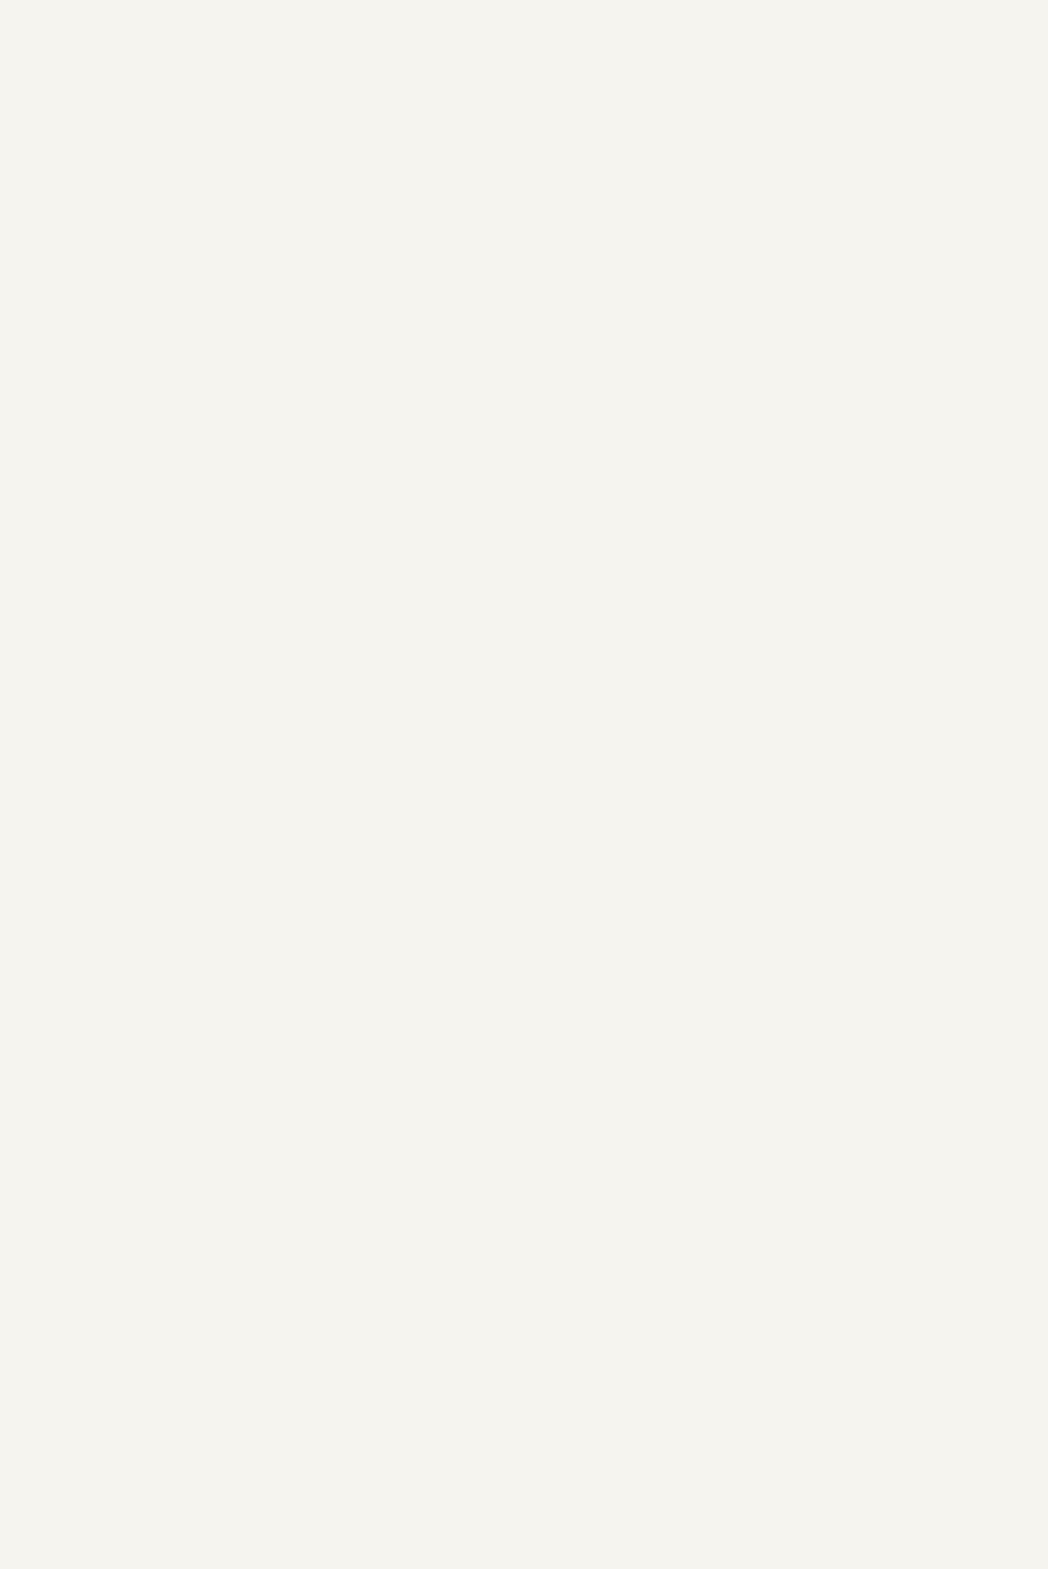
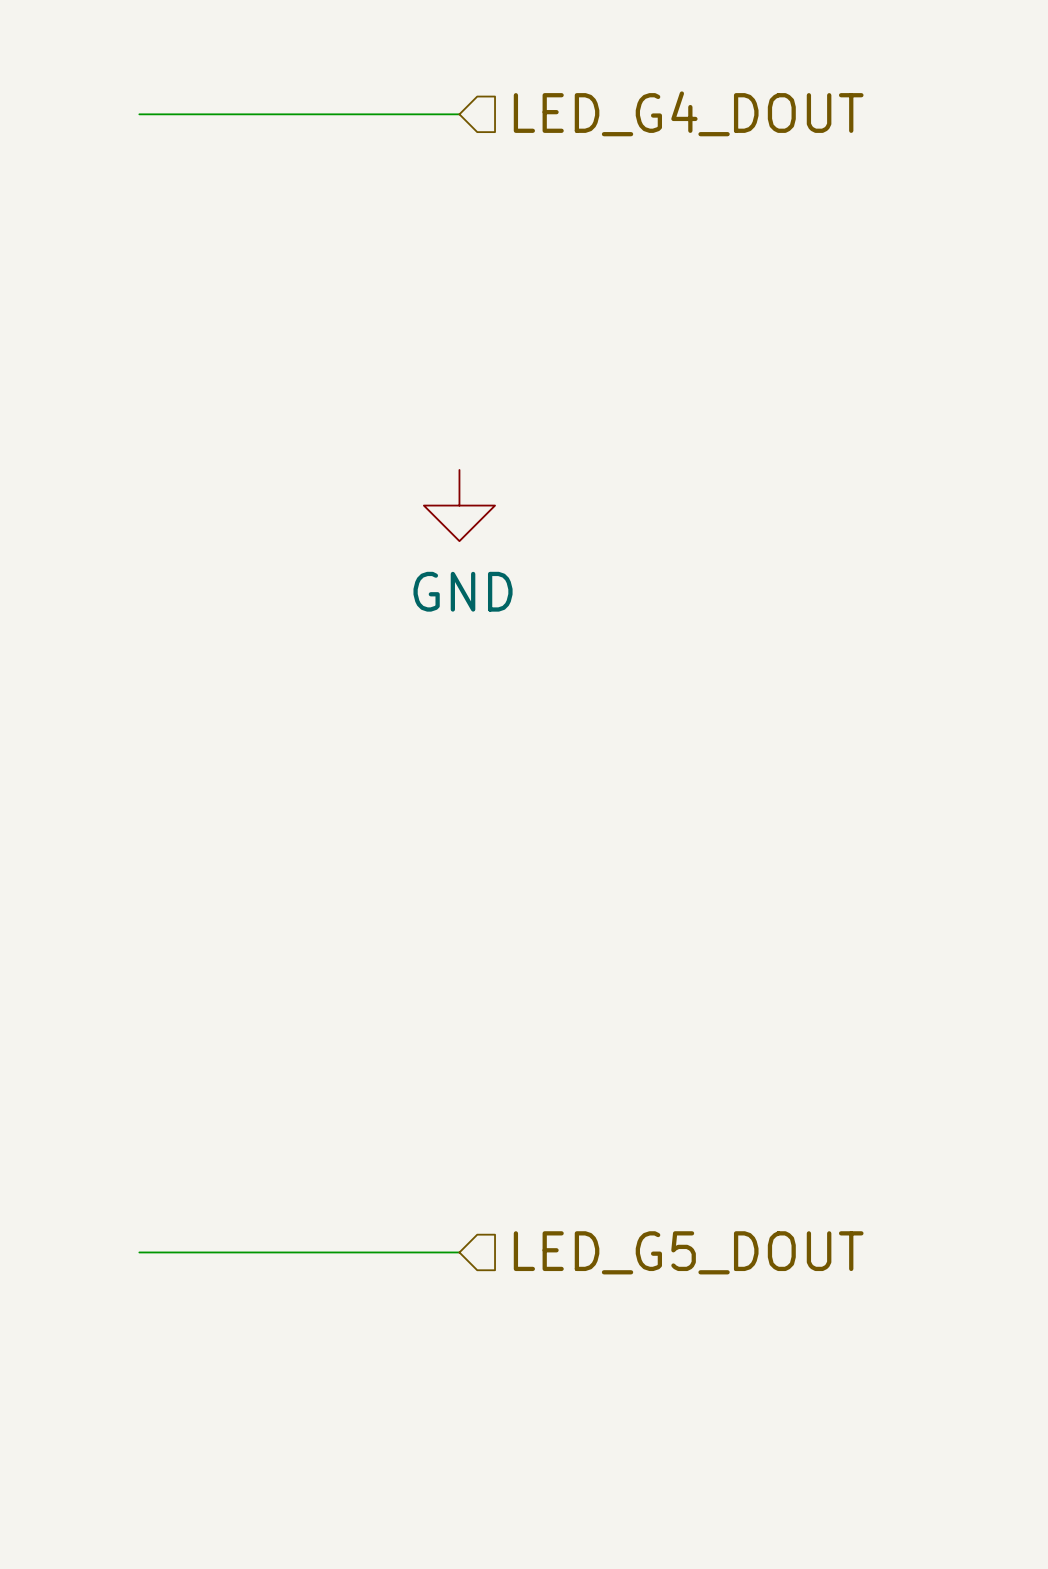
hierarchical label: none -> LED_G4_DOUT (688, 113)
wire: none -> (139, 114) (459, 114)
power symbol: none -> GND (459, 505)
wire: none -> (139, 1252) (459, 1252)
hierarchical label: none -> LED_G5_DOUT (688, 1252)

